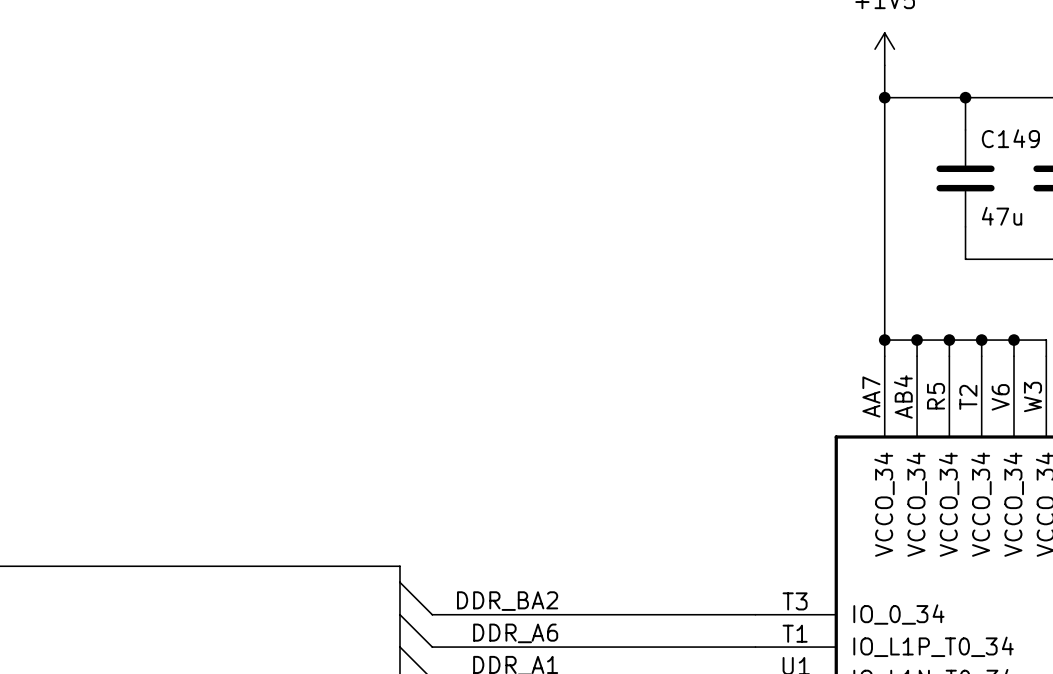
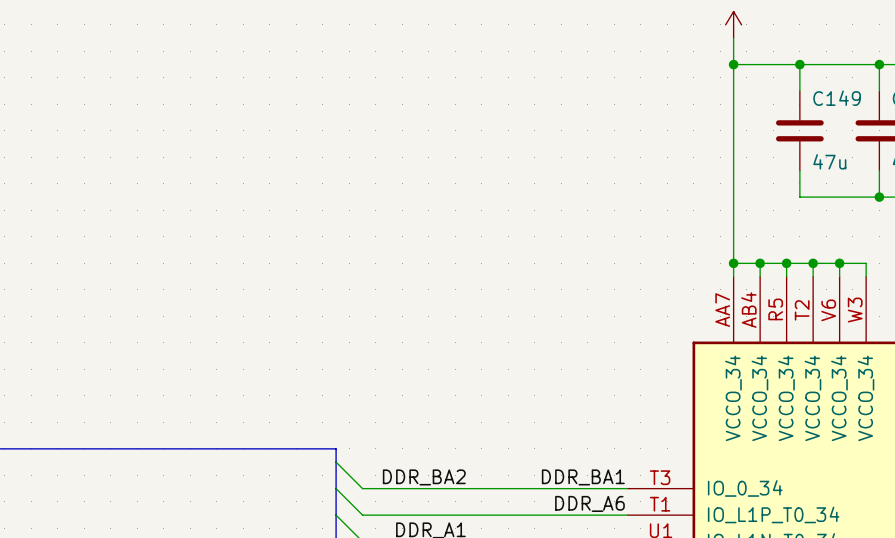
label: none -> DDR_BA1 (583, 477)
label position: DDR_A6 (515, 633) -> DDR_A6 (589, 503)

